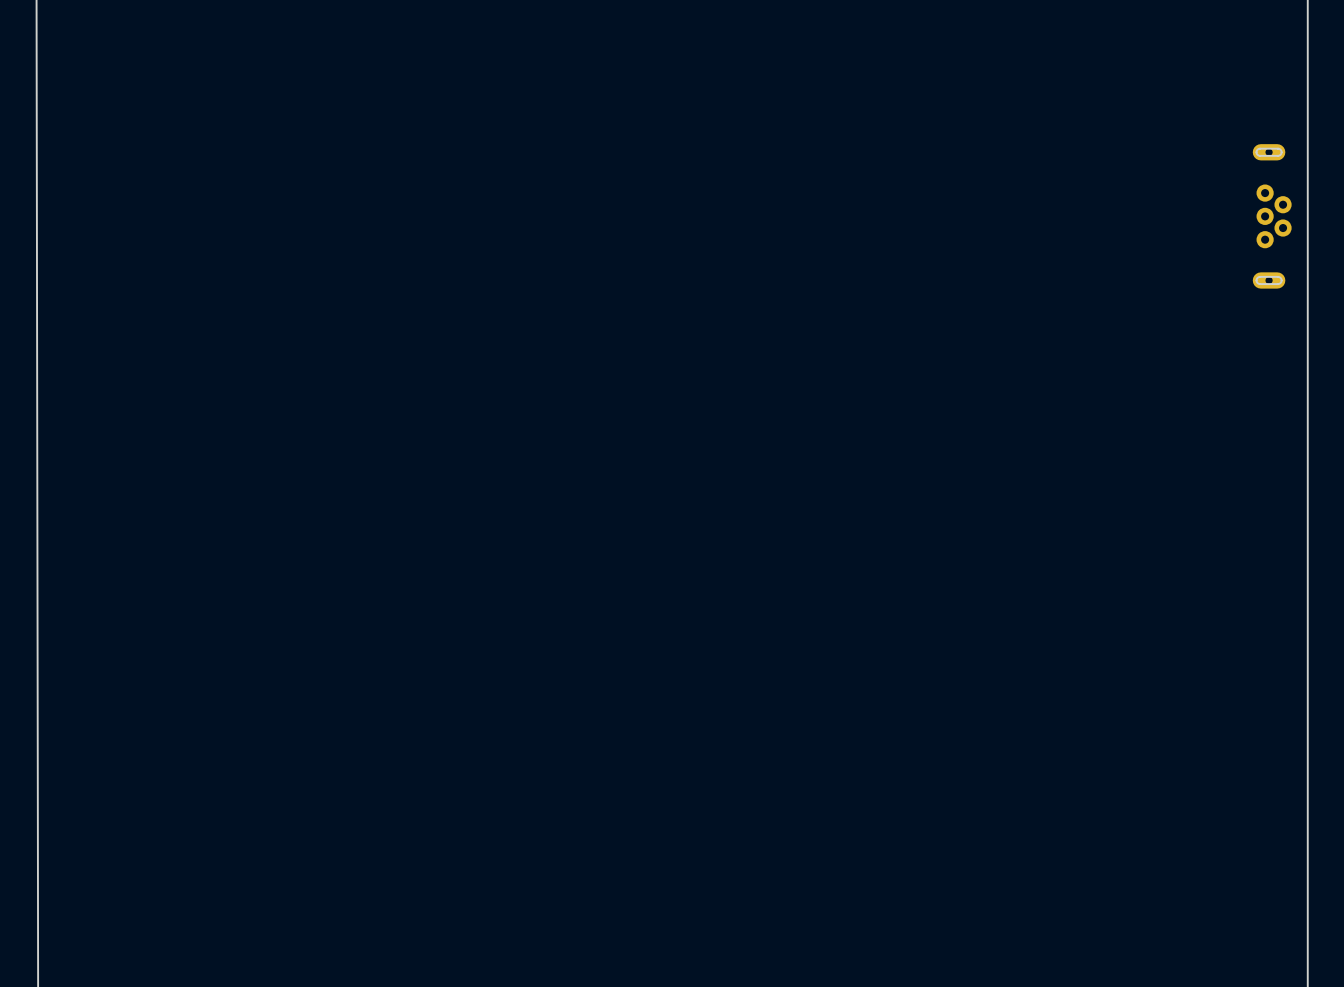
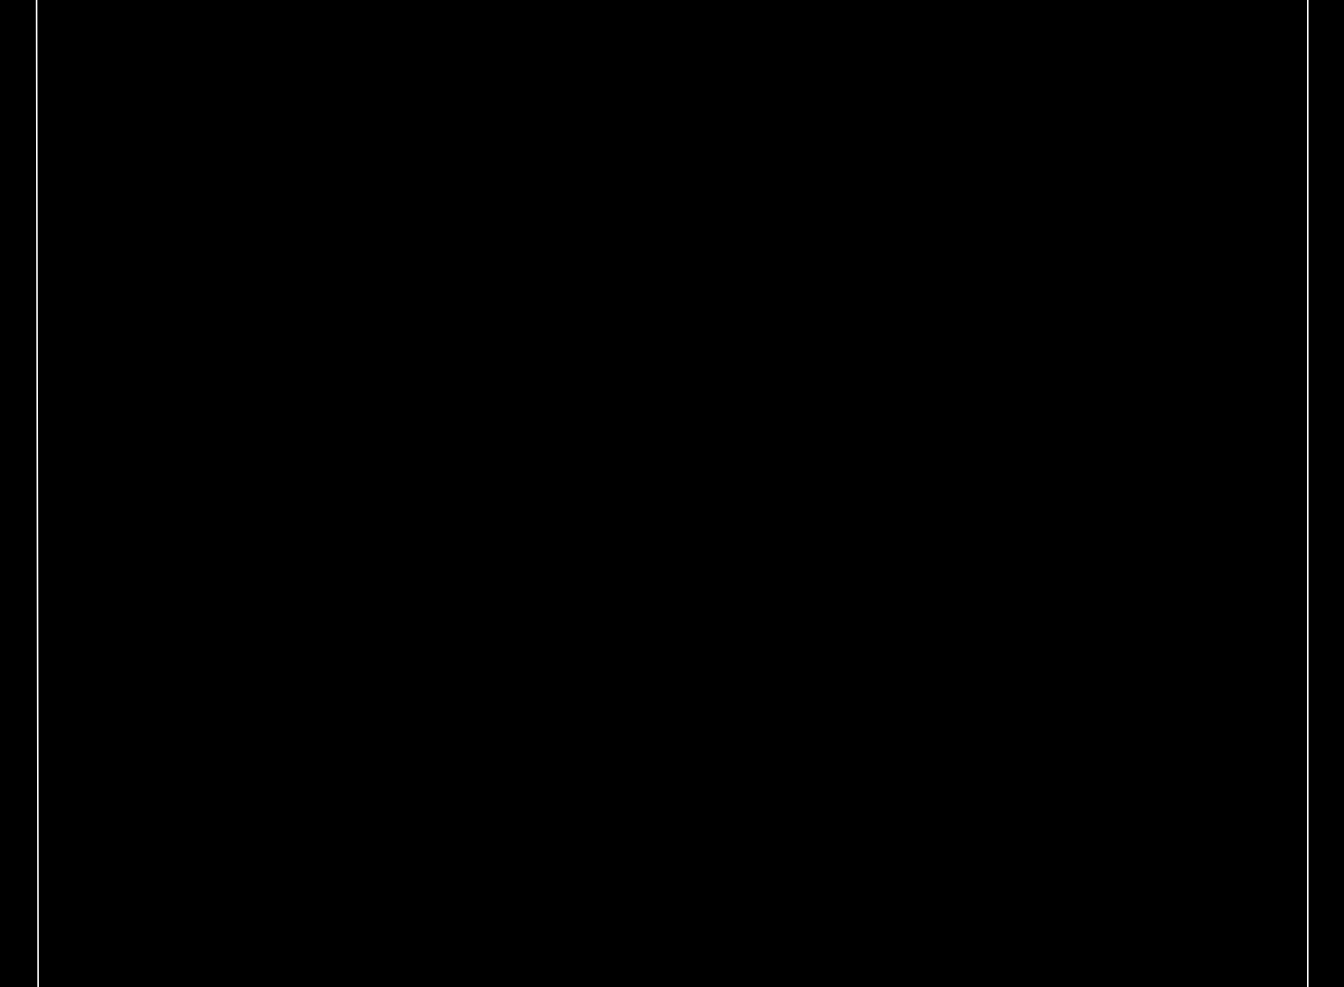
part: (1272, 216) -> none

